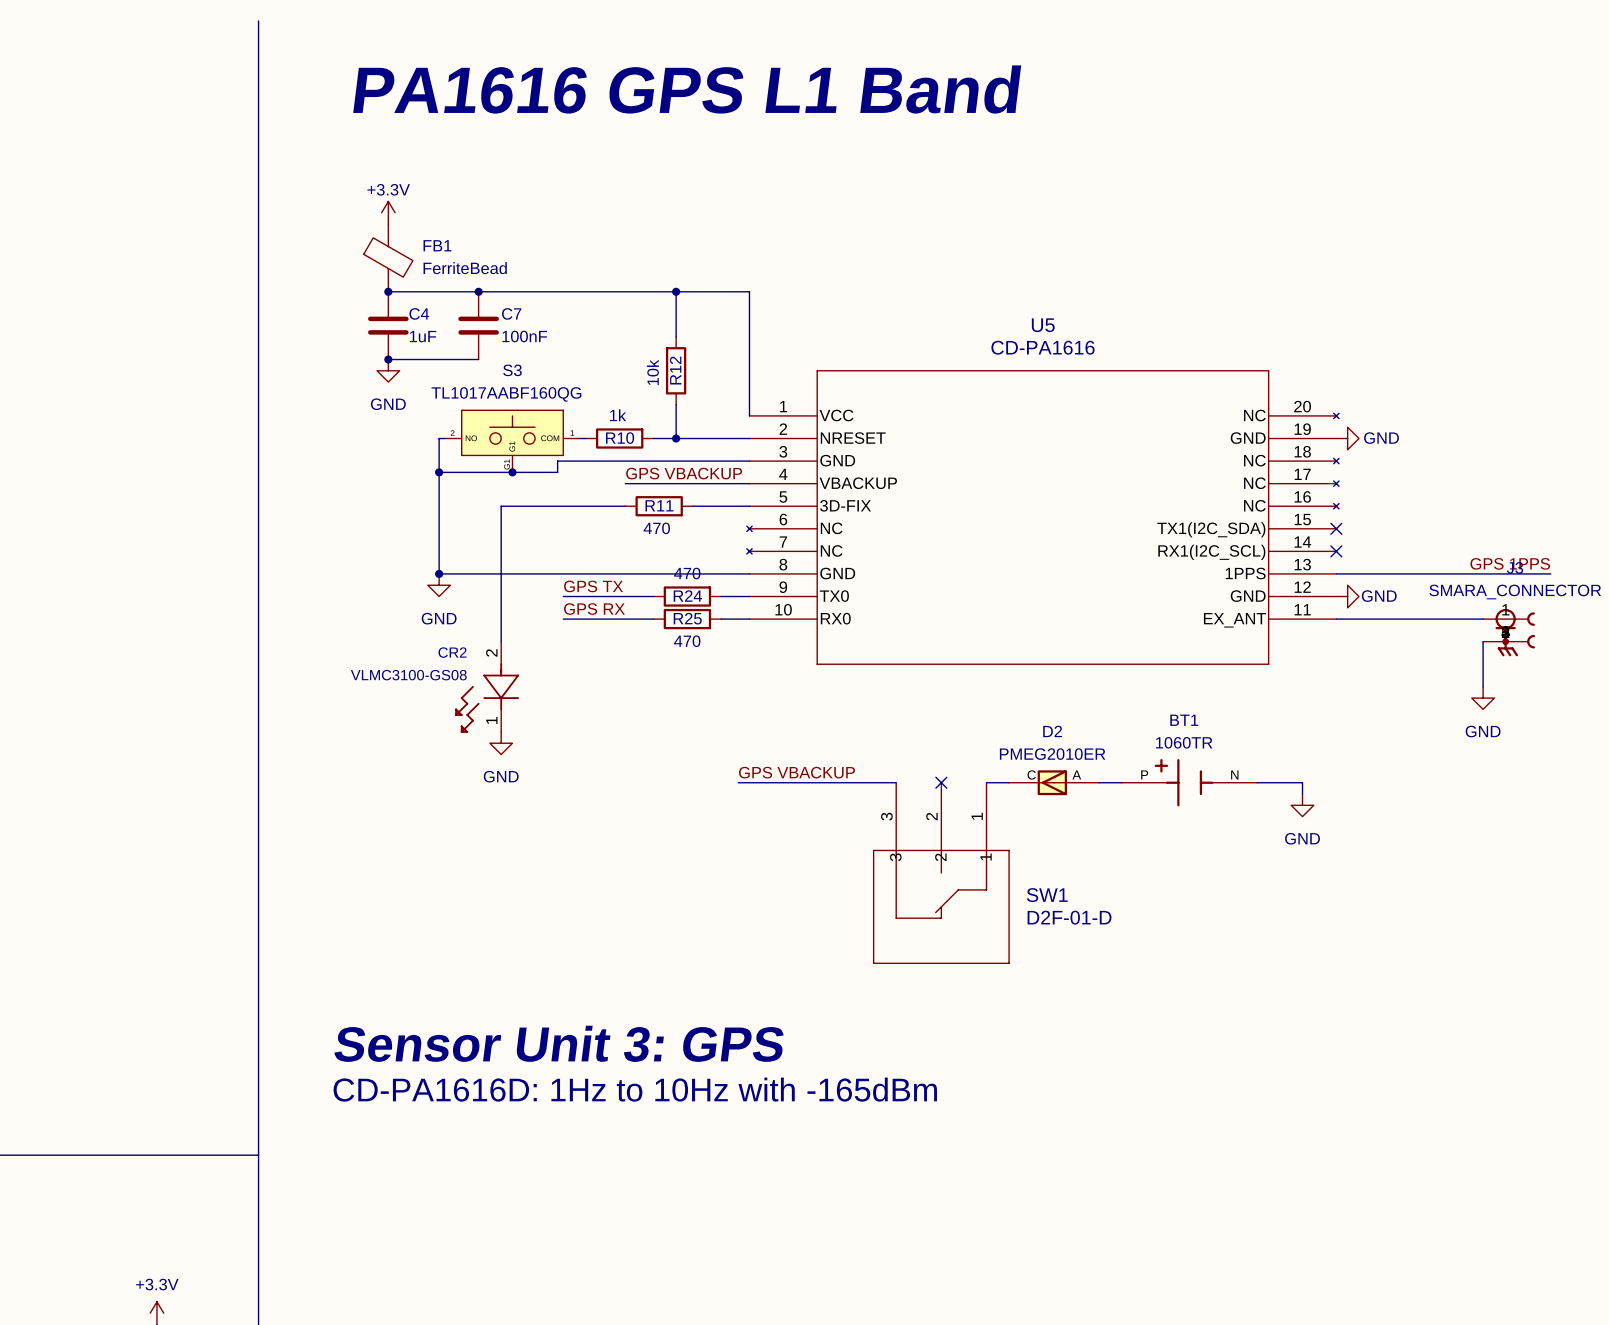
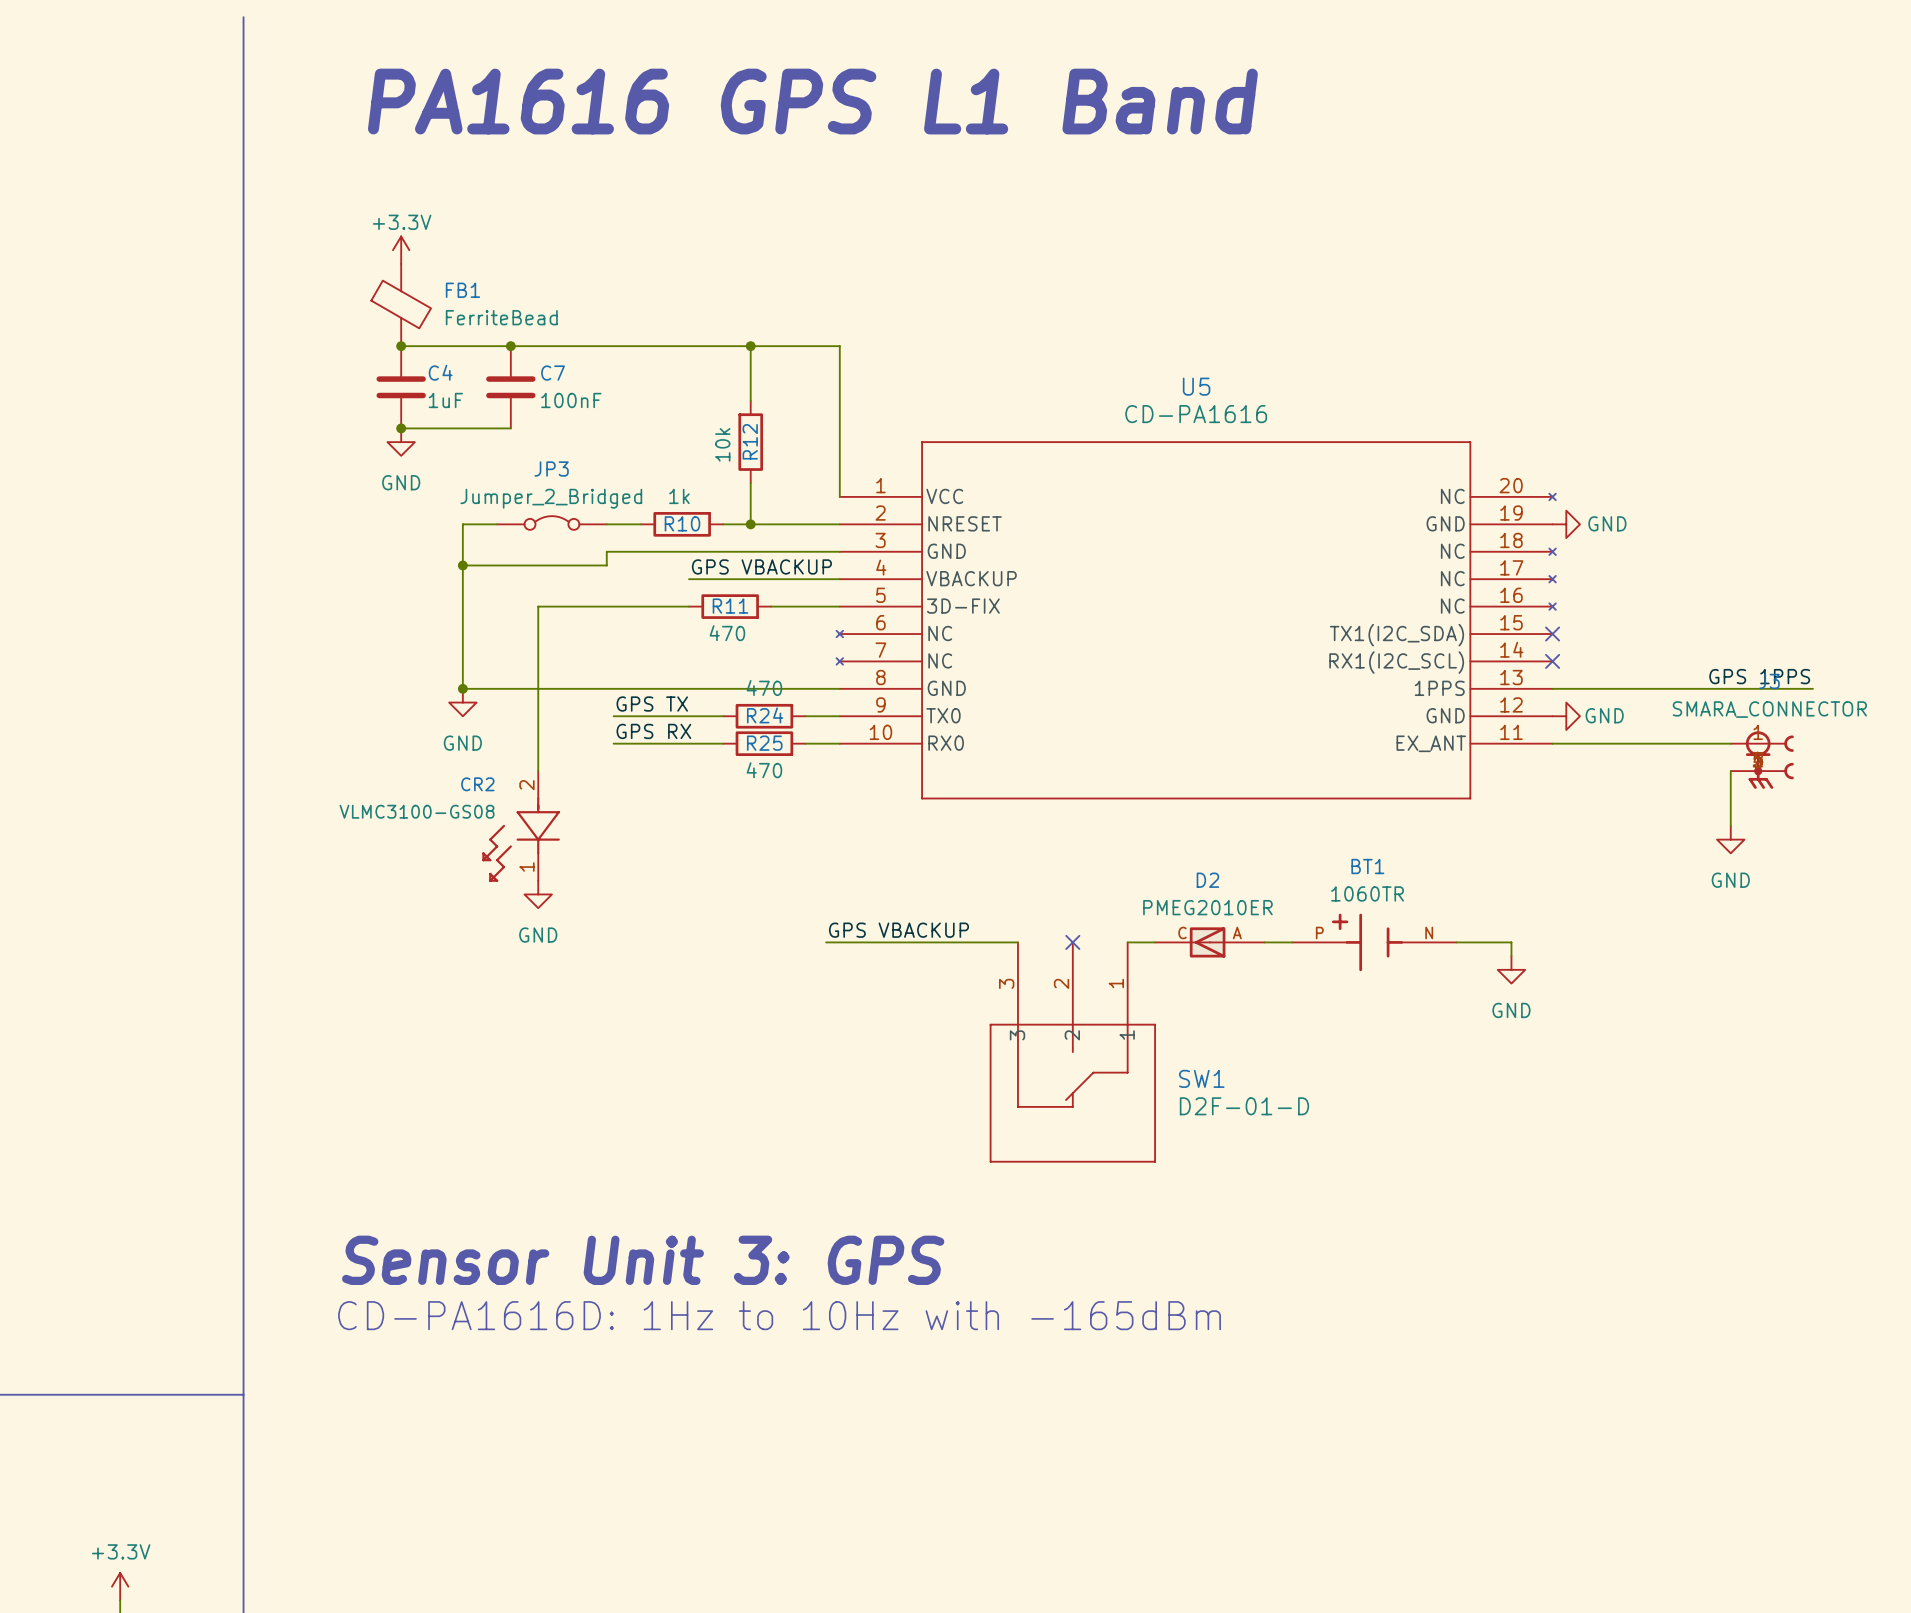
JP3: none -> Jumper_2_Bridged (551, 522)
S3: TL1017AABF160QG (512, 441) -> none
junction: (512, 472) -> none

